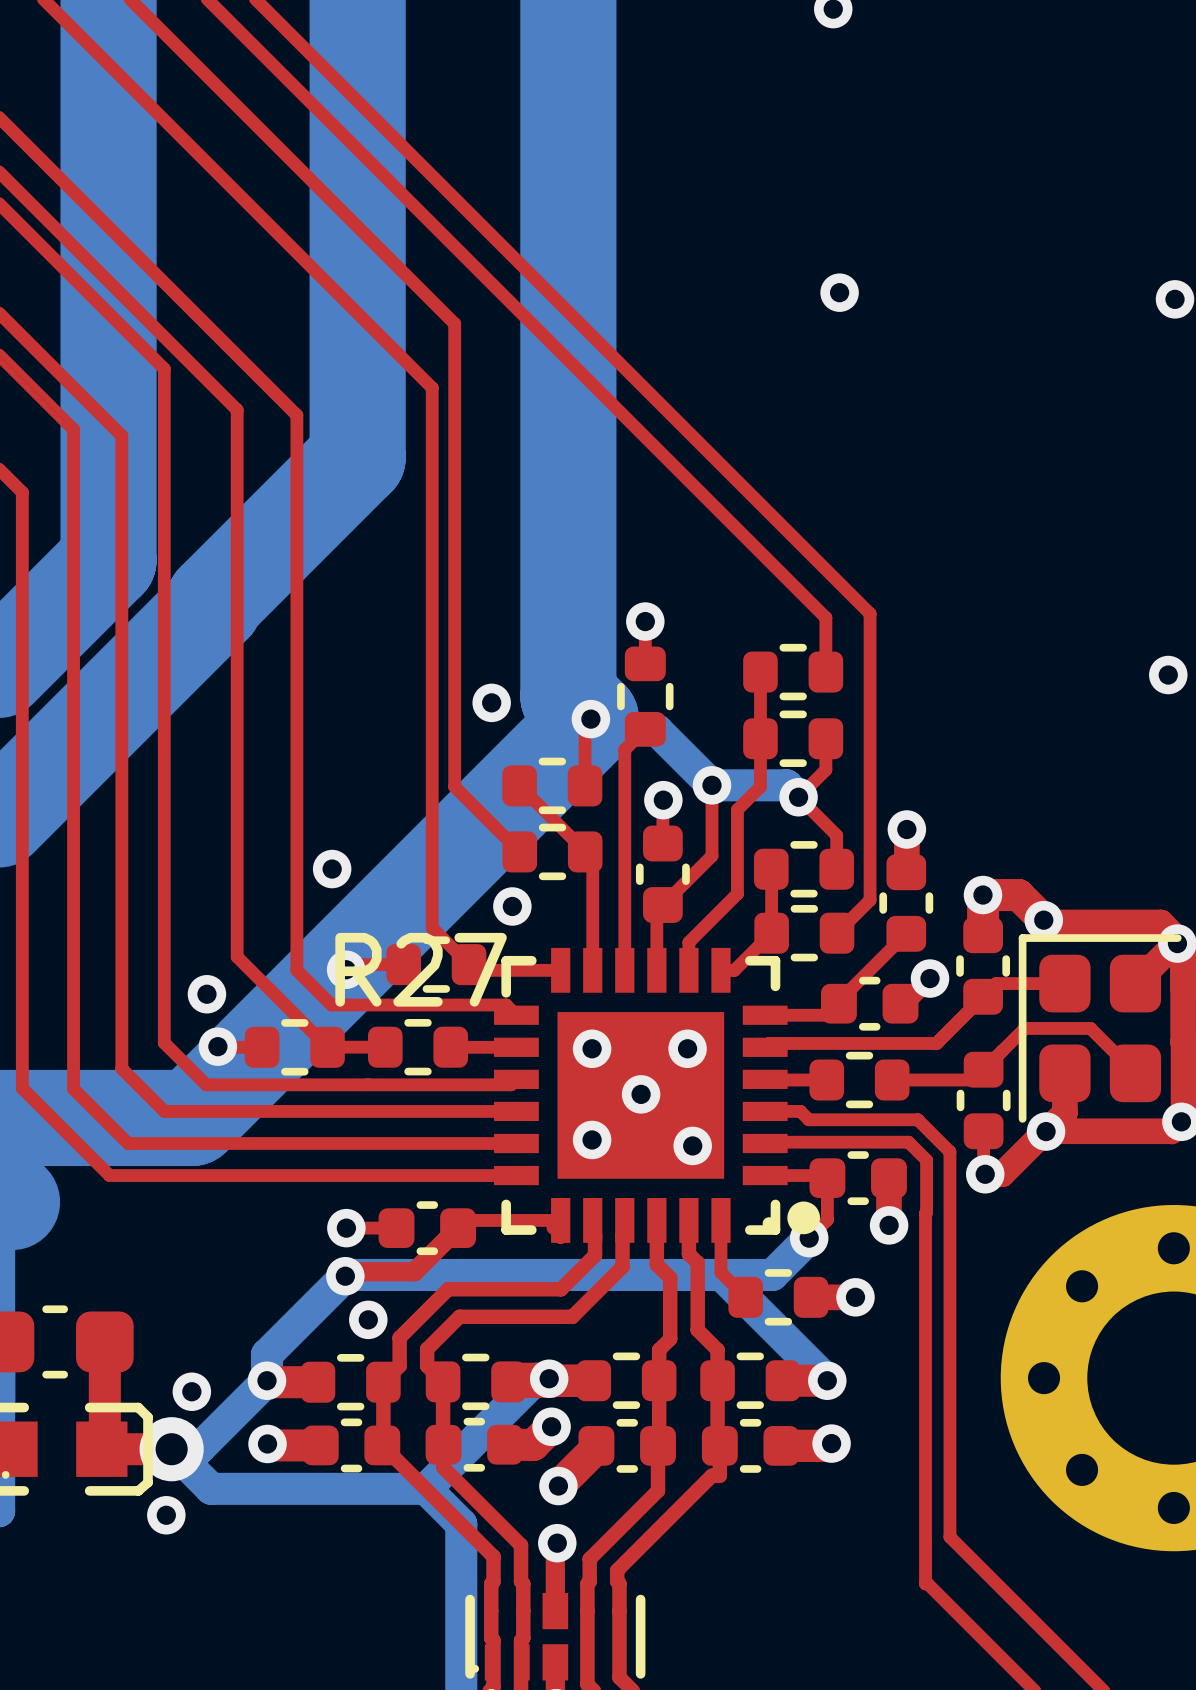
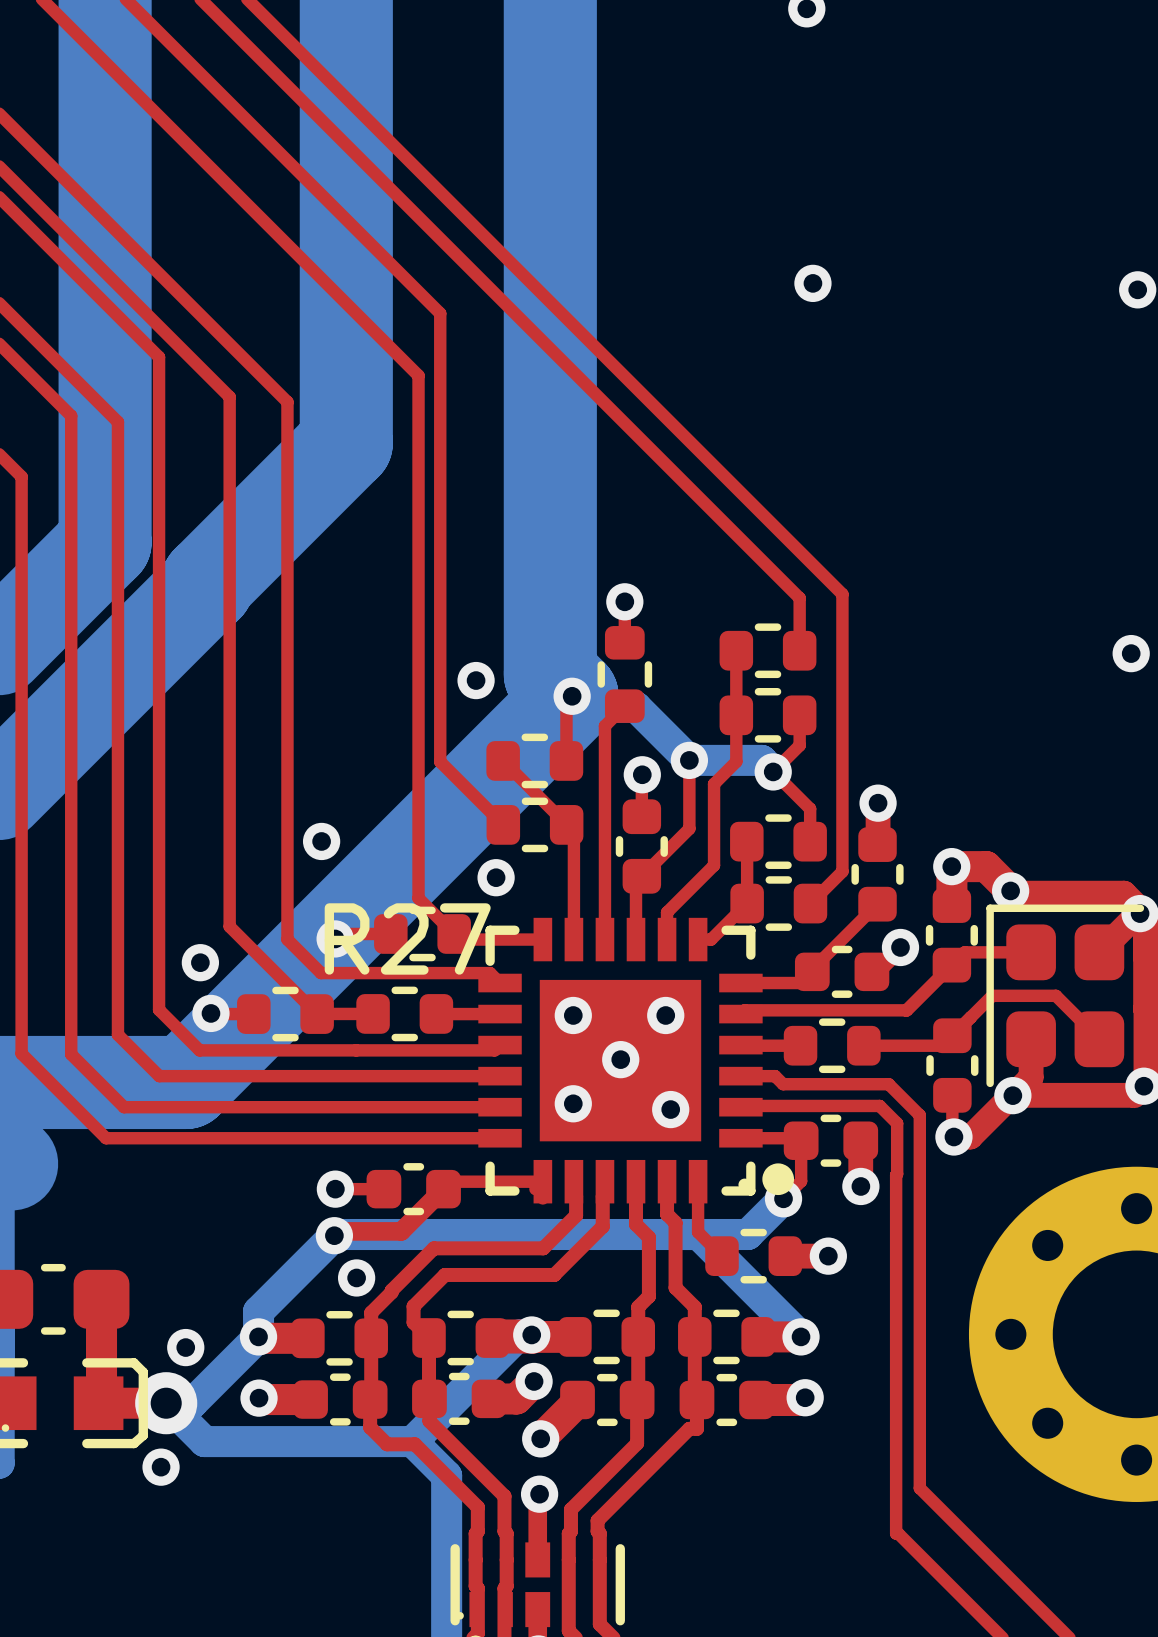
top track: (404, 1332) (399, 1337) (399, 1365) (383, 1382) -> (391, 1290) (371, 1312) (371, 1338)
top track: (382, 1445) (428, 1491) -> (370, 1399) (370, 1427) (387, 1444) (414, 1444)

